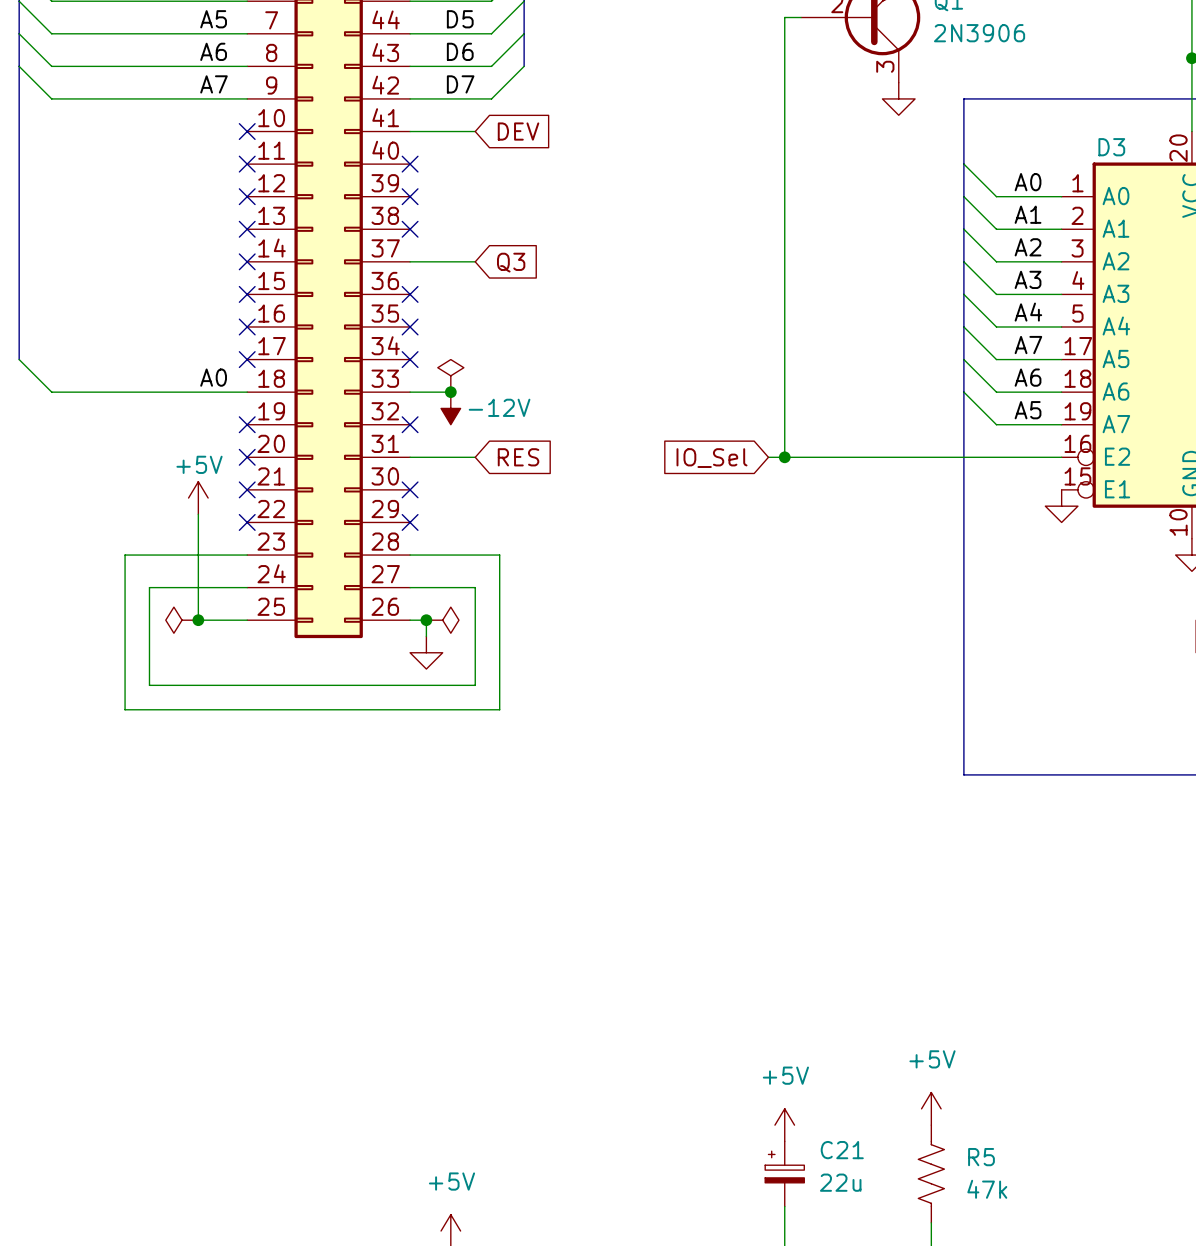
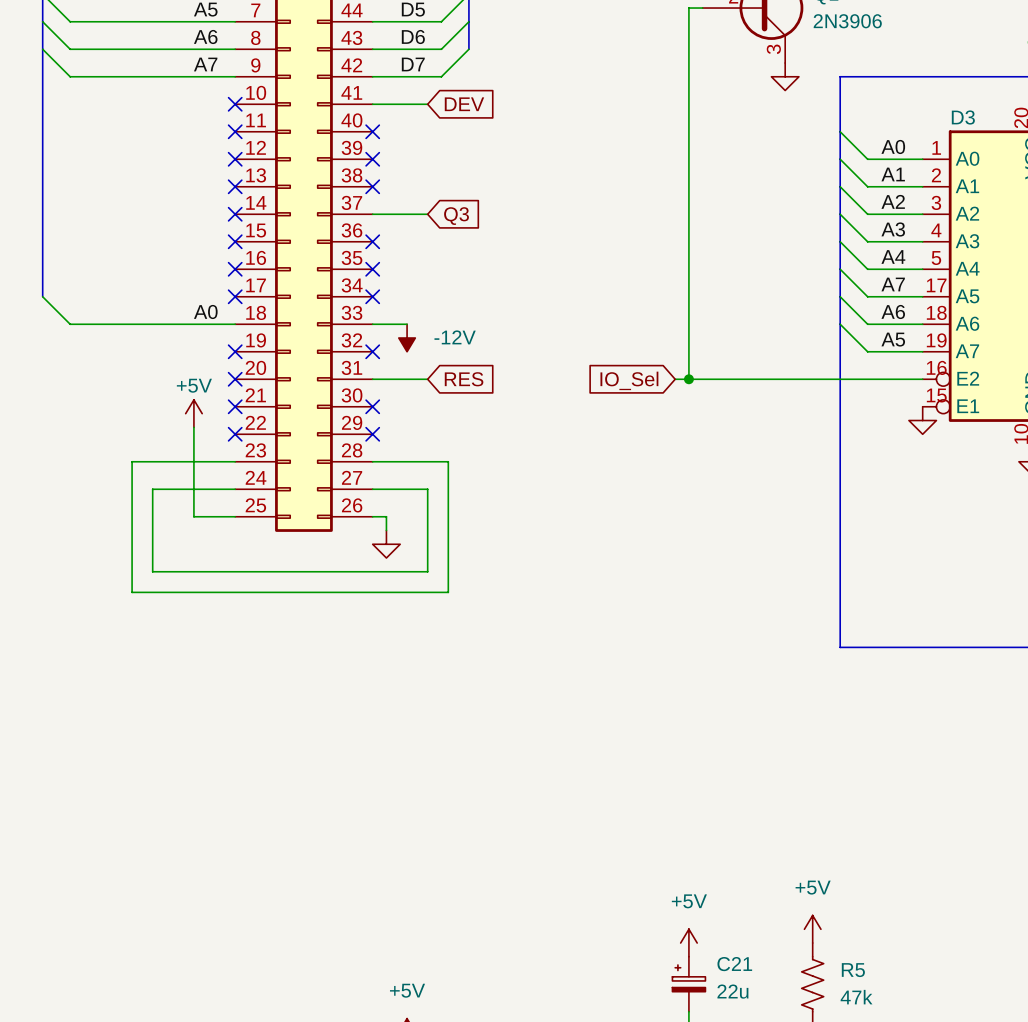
power symbol: (450, 375) -> none
junction: (450, 392) -> none
power symbol: (182, 620) -> none
junction: (198, 620) -> none
junction: (426, 620) -> none
power symbol: (442, 620) -> none

